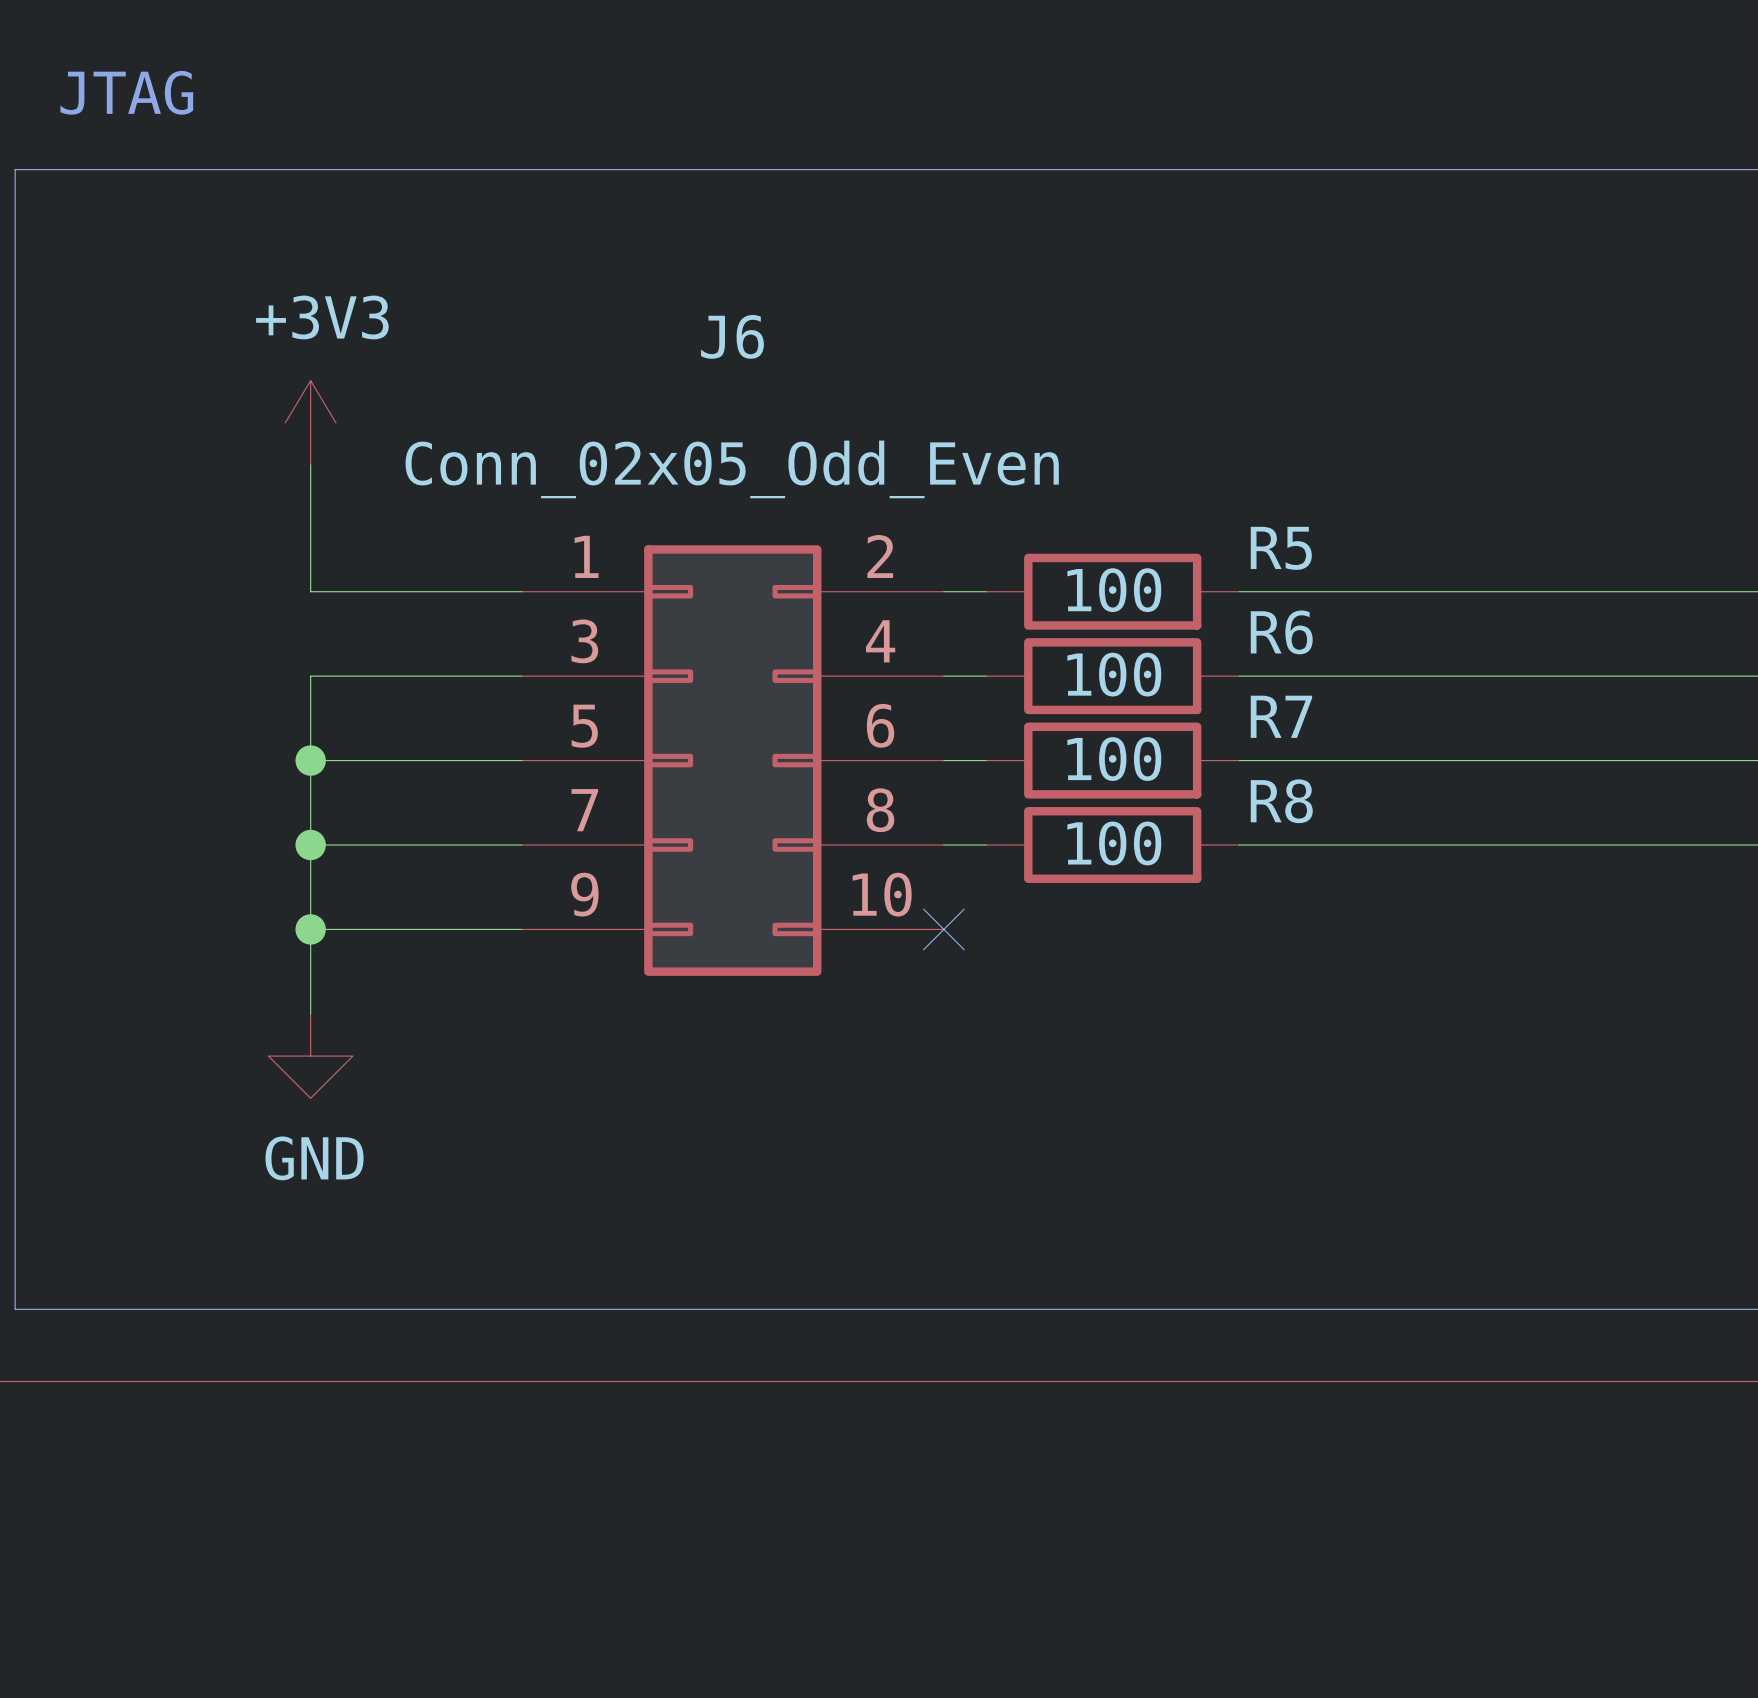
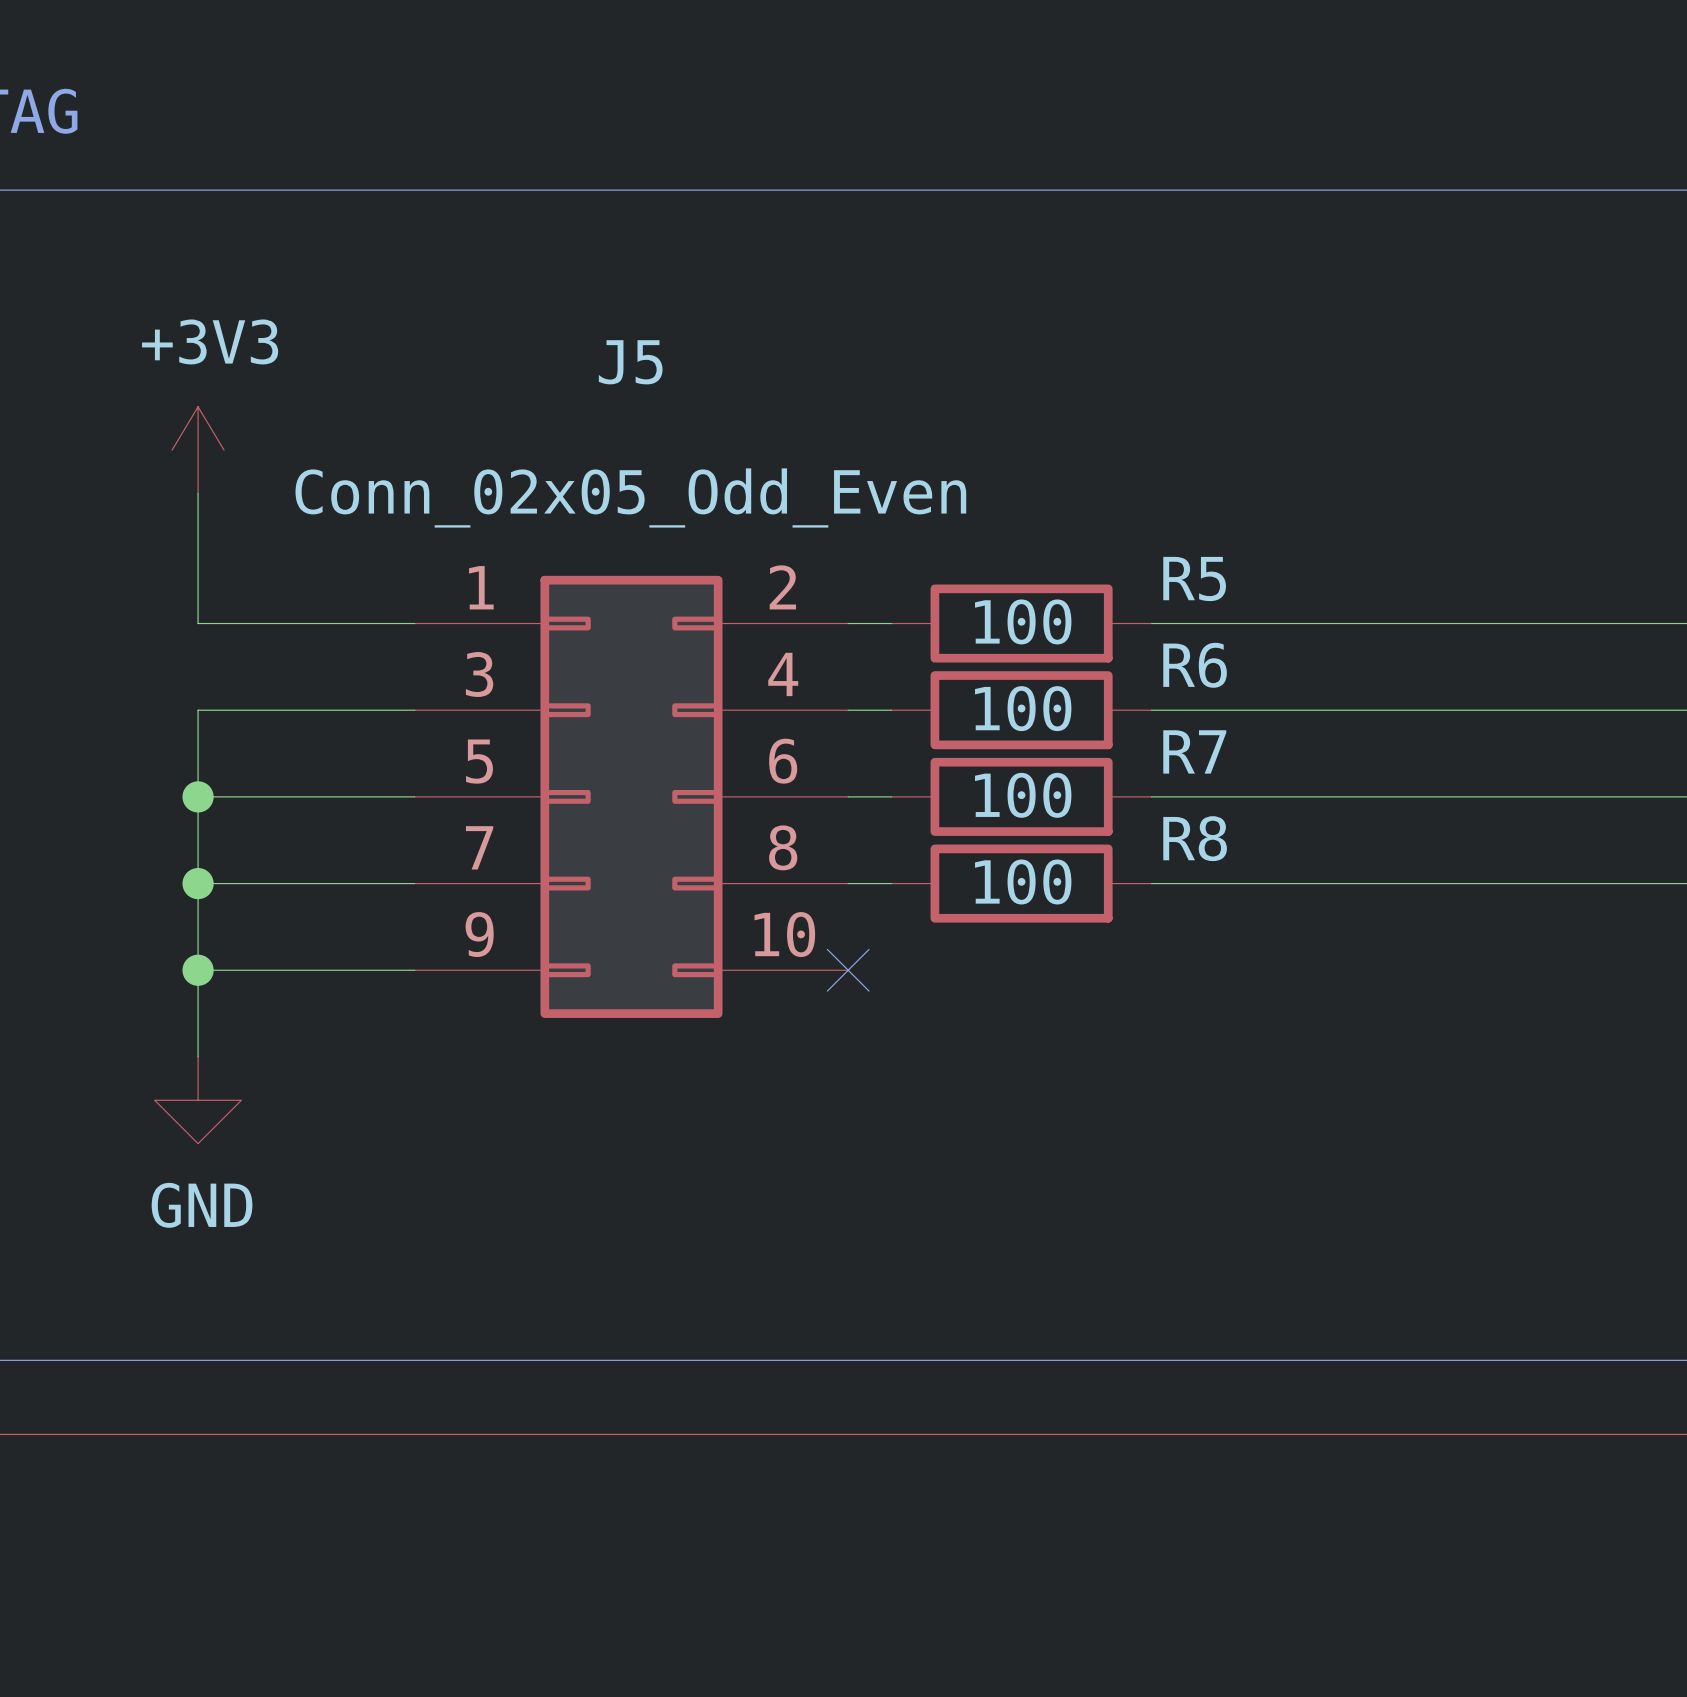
J6 name: J6 (732, 336) -> J5 (630, 362)

